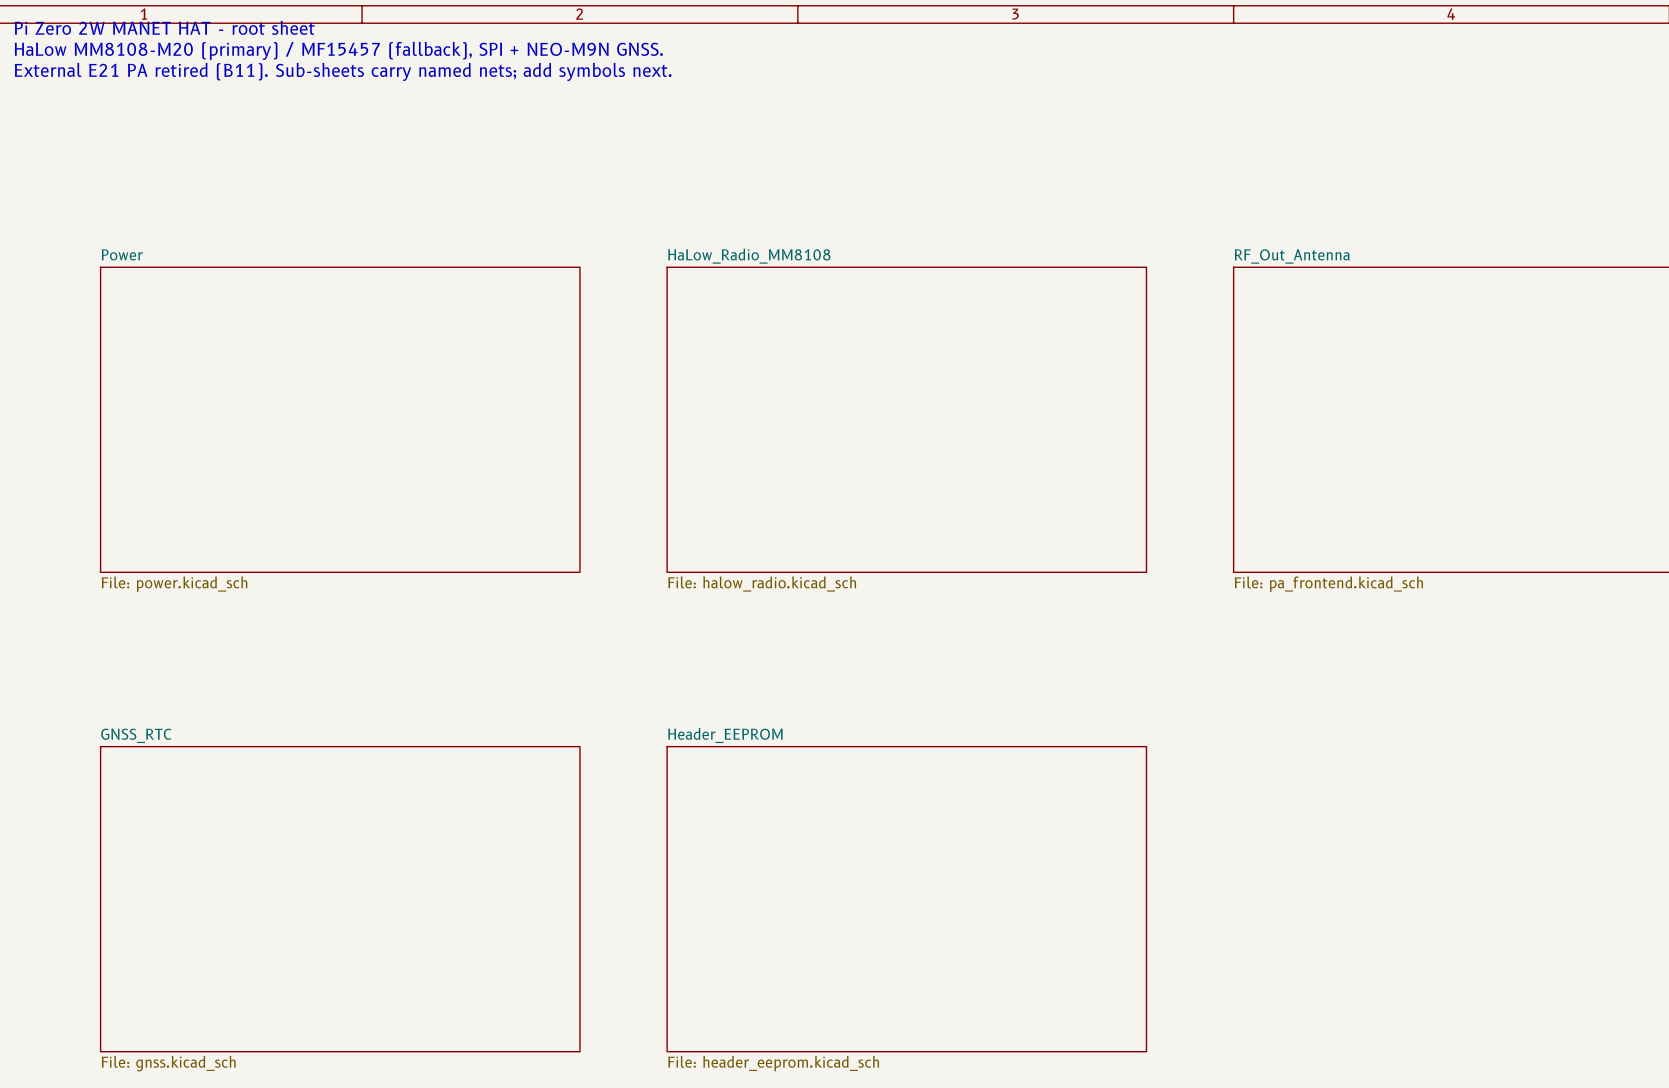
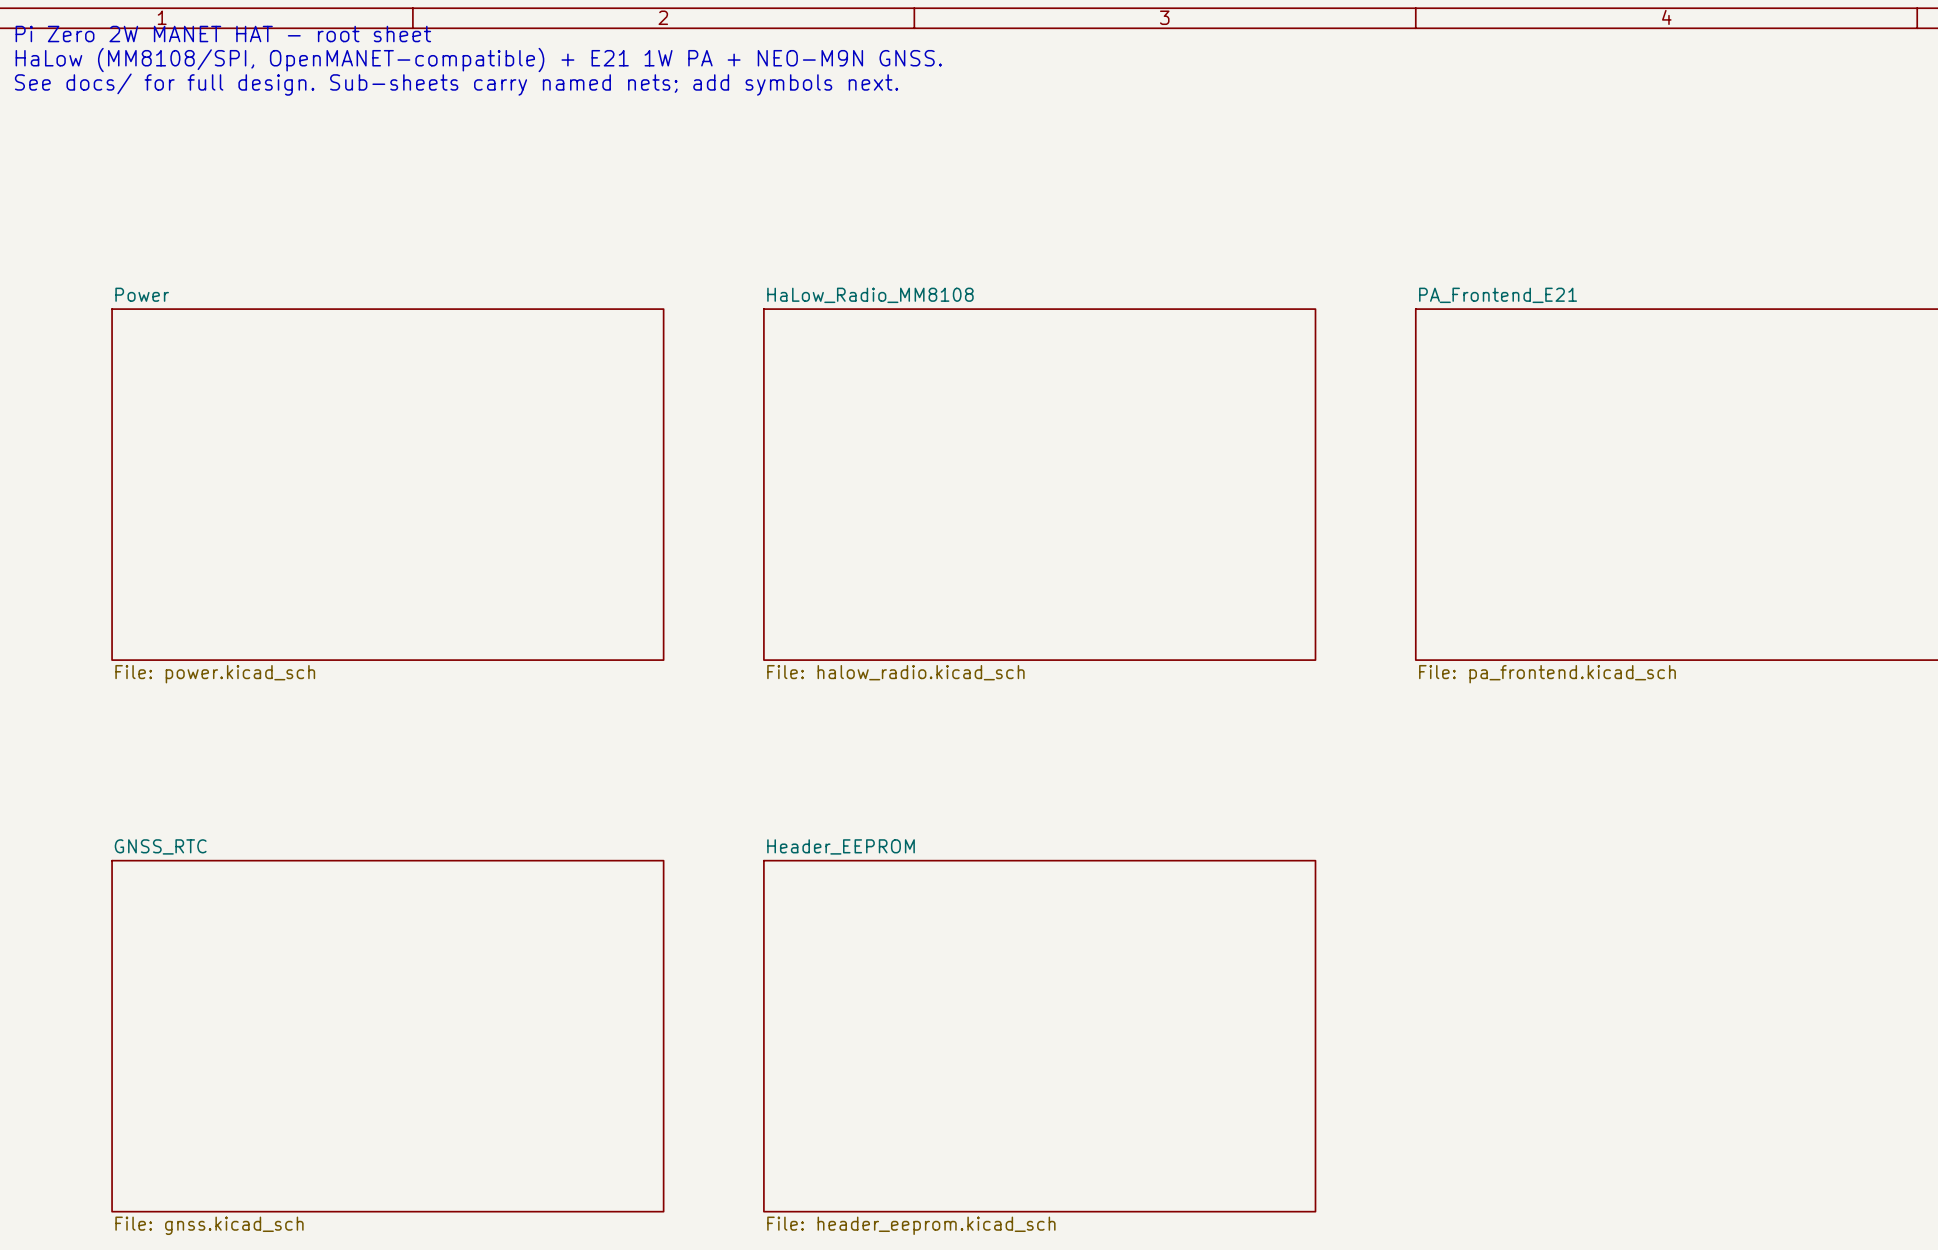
text: HaLow MM8108-M20 (primary) / MF15457 (fallback), SPI + NEO-M9N GNSS. (338, 50) -> HaLow (MM8108/SPI, OpenMANET-compatible) + E21 1W PA + NEO-M9N GNSS. (478, 60)
text: External E21 PA retired (B11). Sub-sheets carry named nets; add symbols next. (343, 71) -> See docs/ for full design. Sub-sheets carry named nets; add symbols next. (456, 84)
sheet RF_Out_Antenna name: RF_Out_Antenna (1292, 256) -> PA_Frontend_E21 (1498, 295)

